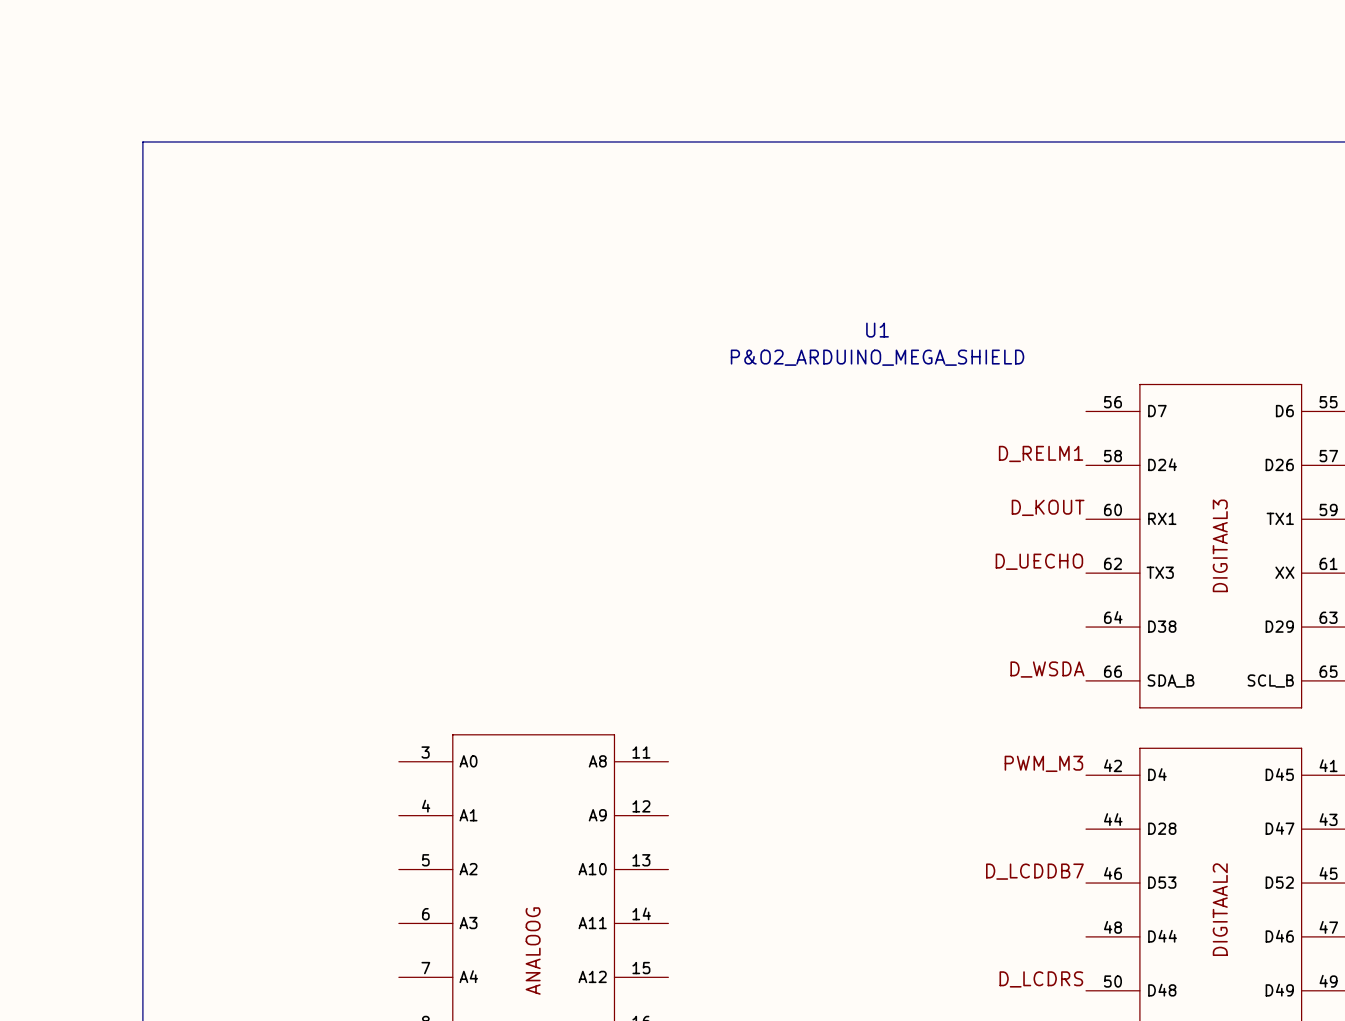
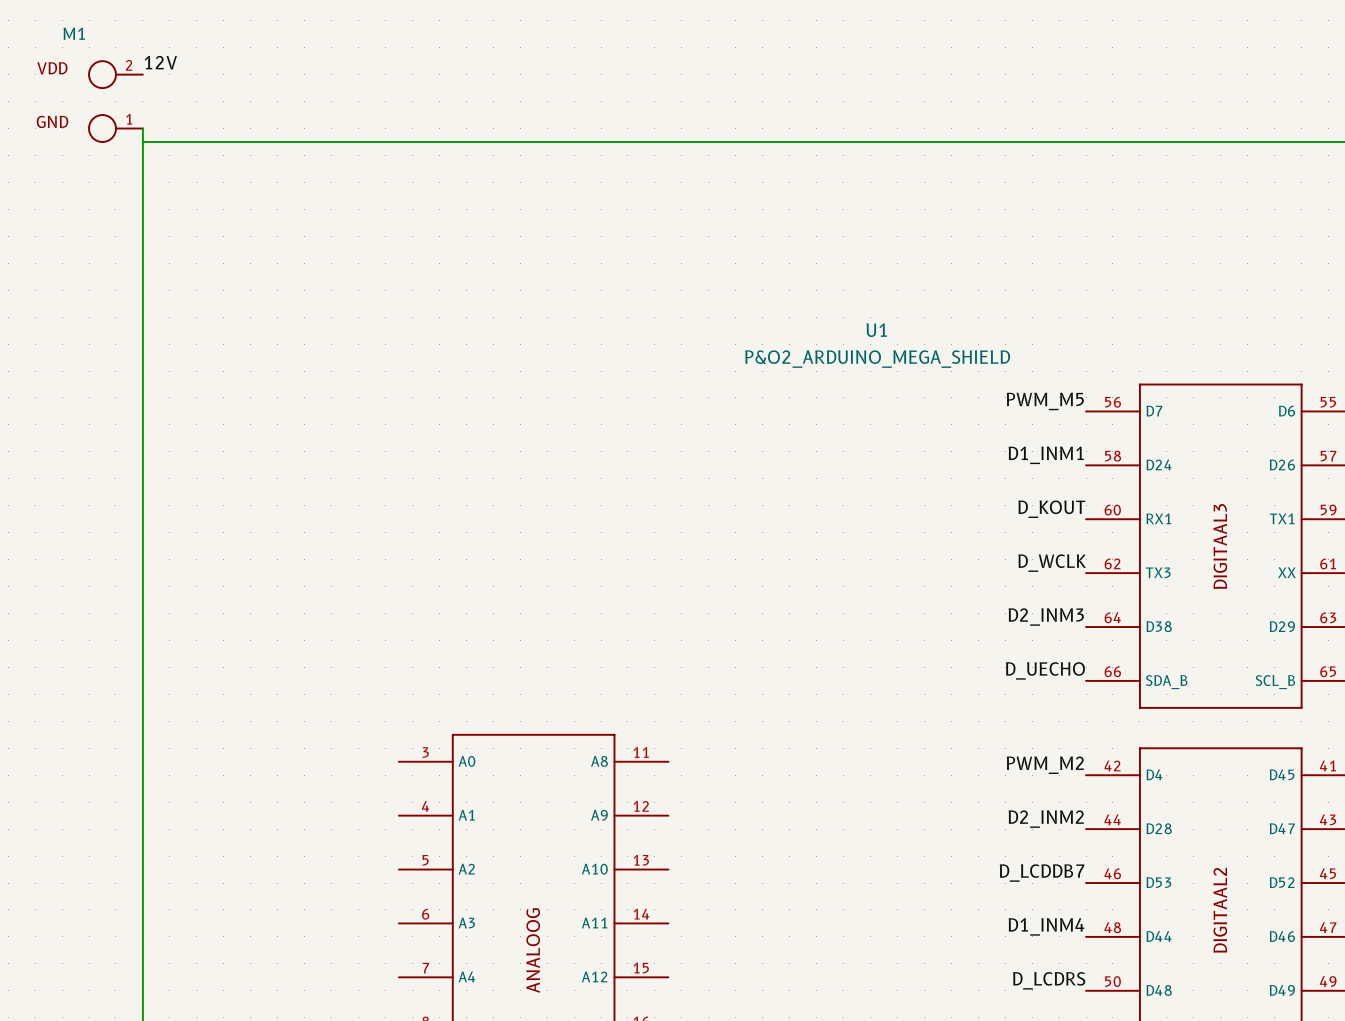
label: none -> 12V (160, 62)
M1: none -> (115, 101)
wire: none -> (142, 128) (142, 141)
label: none -> PWM_M5 (1045, 401)
label: D_RELM1 (1041, 453) -> D1_INM1 (1046, 455)
label: D_UECHO (1039, 561) -> D_WCLK (1052, 563)
label: none -> D2_INM3 (1046, 617)
label: D_WSDA (1047, 669) -> D_UECHO (1045, 670)
label: PWM_M3 (1043, 763) -> PWM_M2 (1045, 765)
label: none -> D2_INM2 (1046, 819)
label: none -> D1_INM4 (1046, 926)

